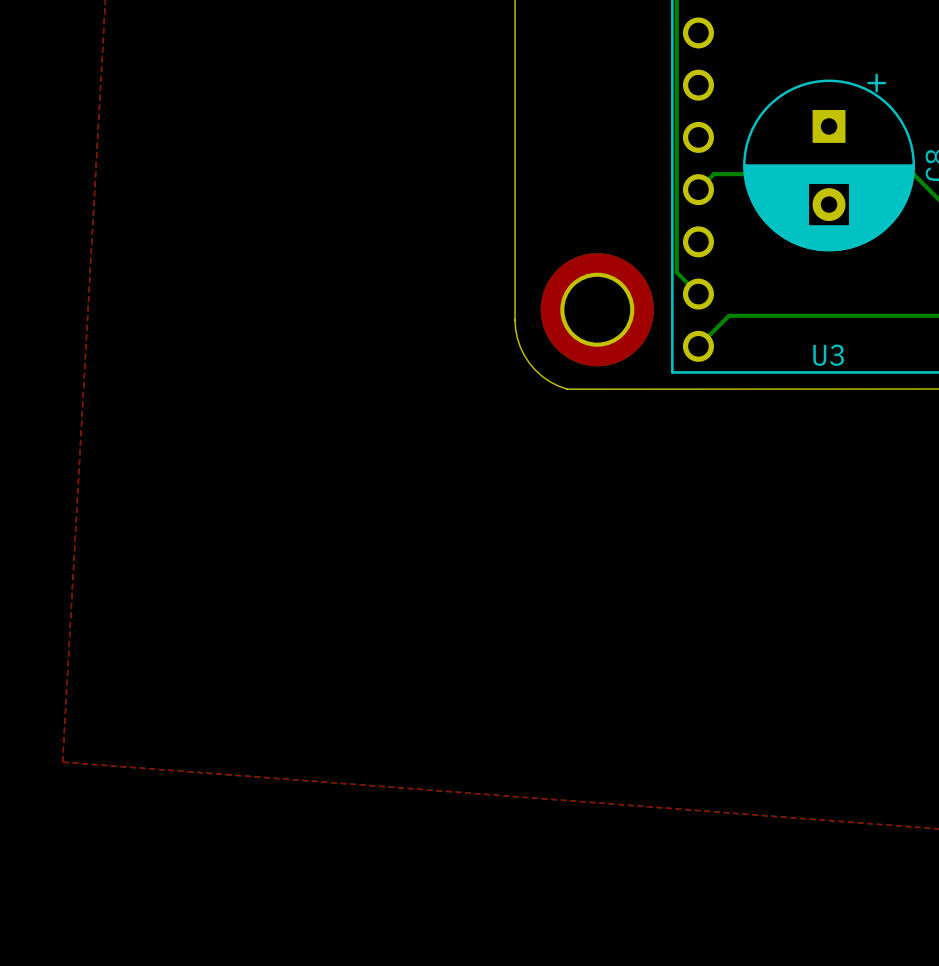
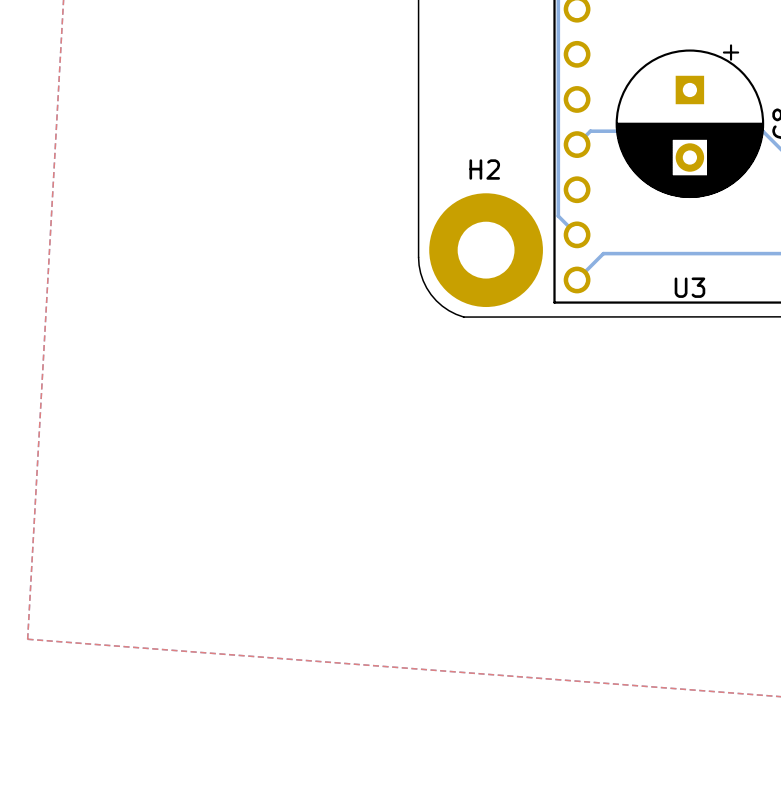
part: (597, 309) -> none
H2: none -> (486, 250)

